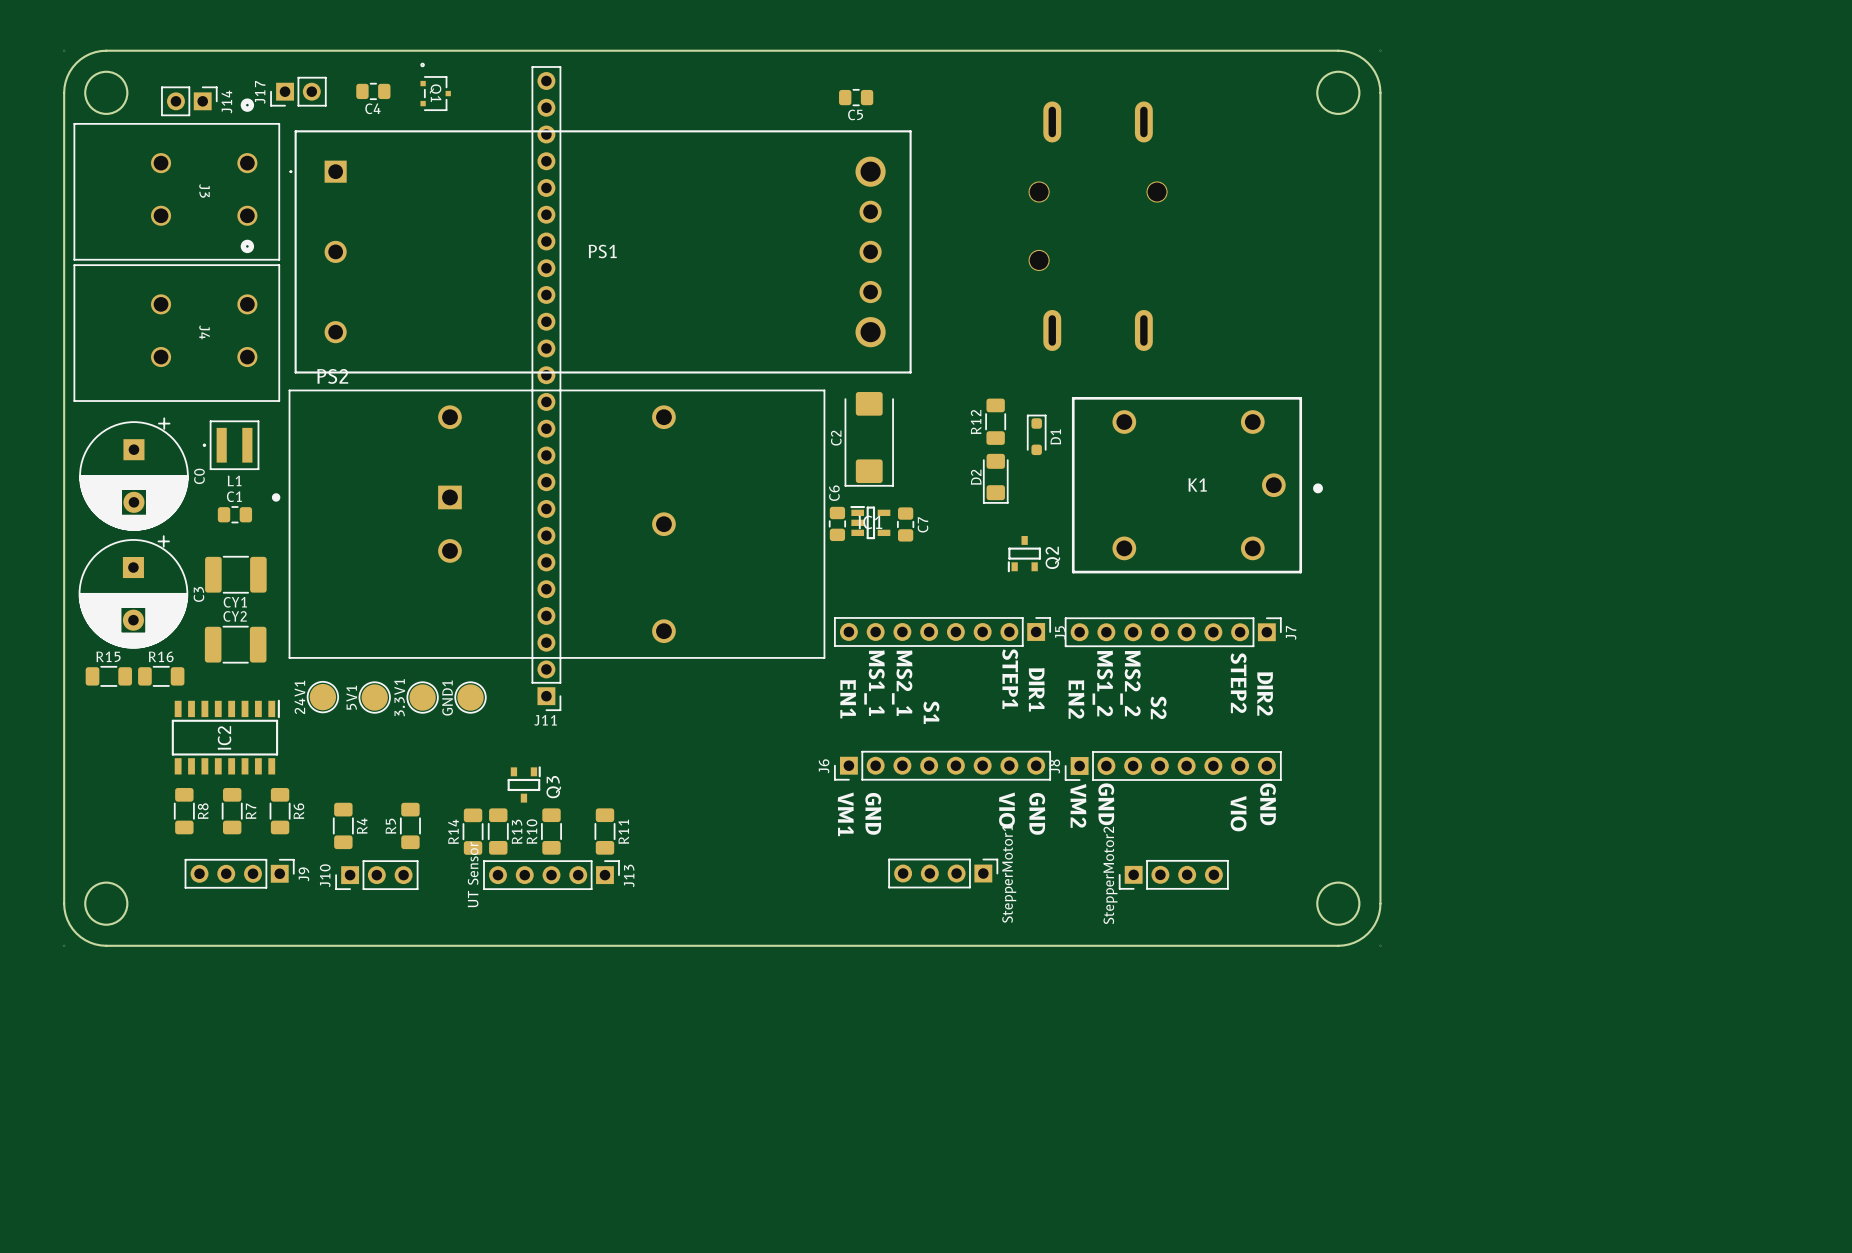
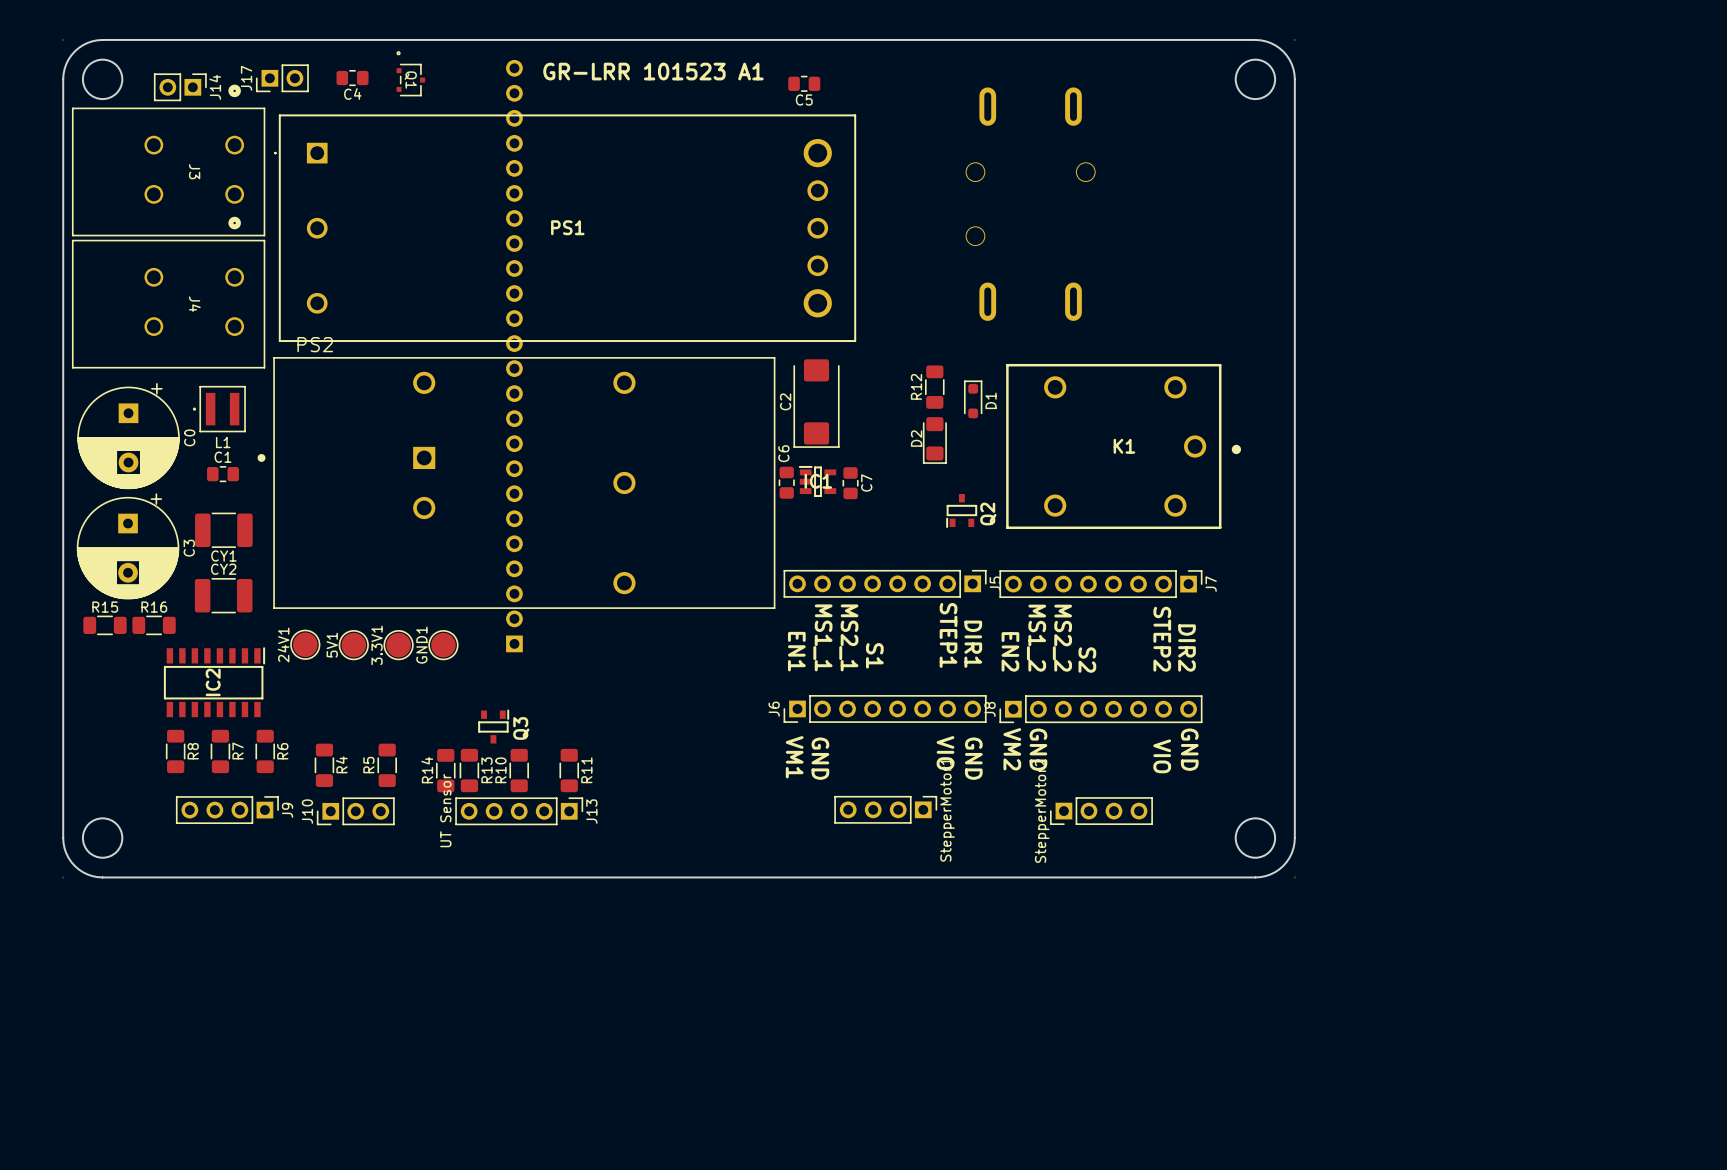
text: none -> GR-LRR 101523 A1 (653, 71)
J11 side: top (546, 388) -> bottom (514, 356)

